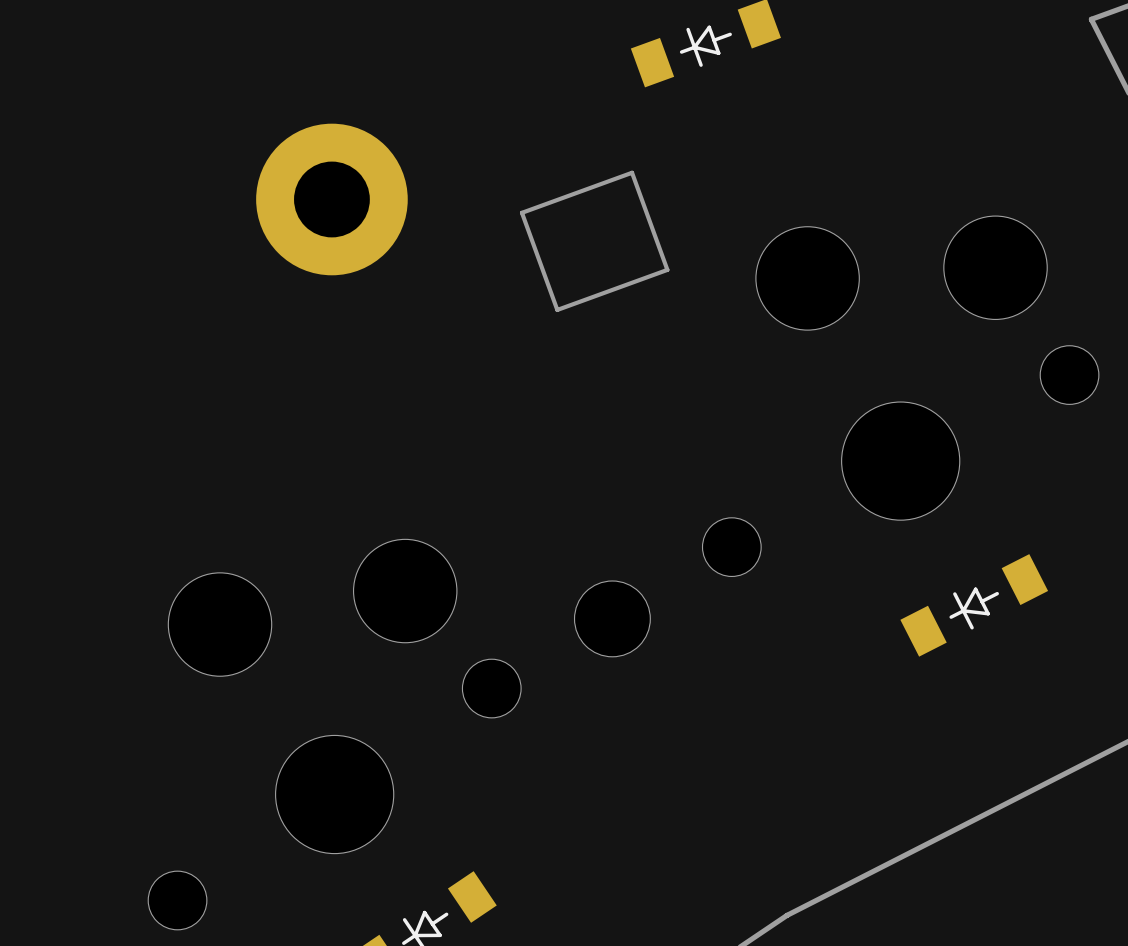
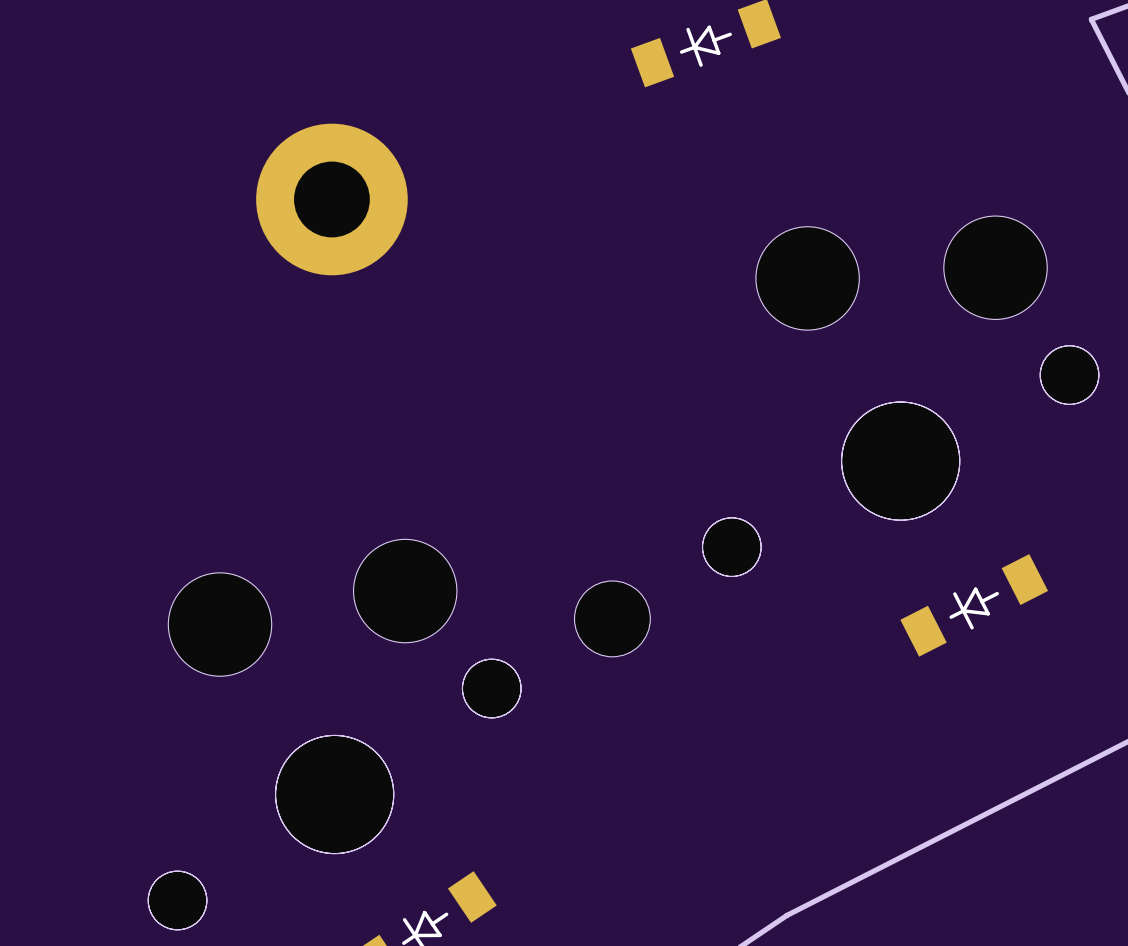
part: (594, 241) -> none
part: none -> (900, 461)
part: none -> (334, 794)

